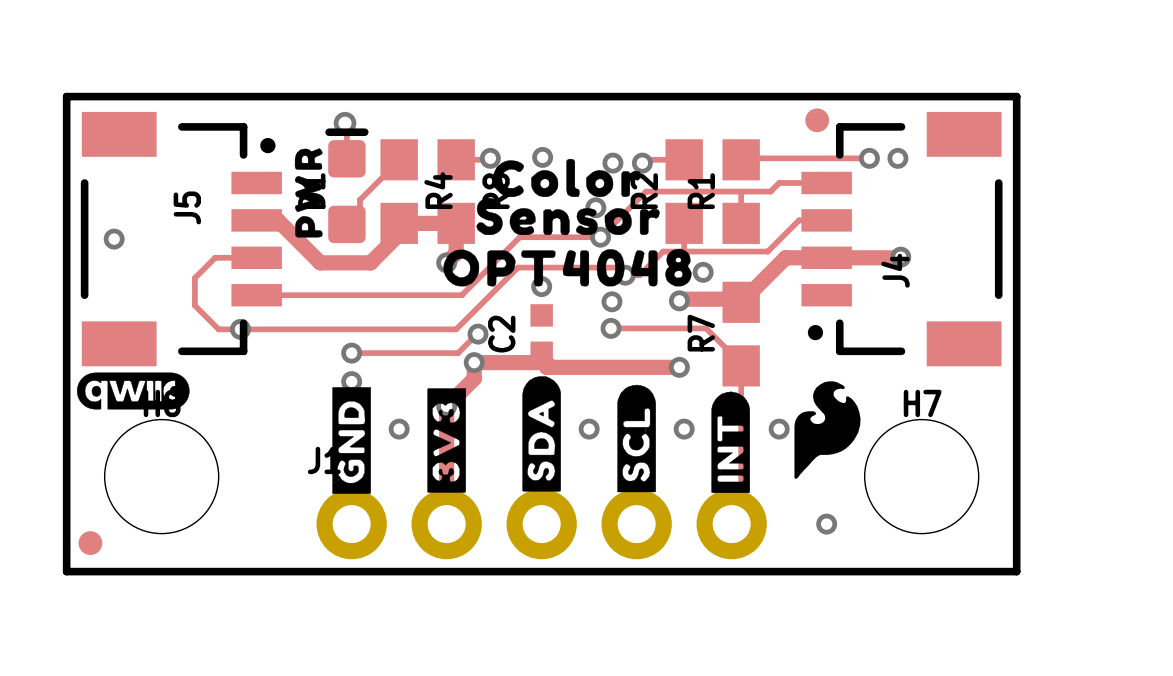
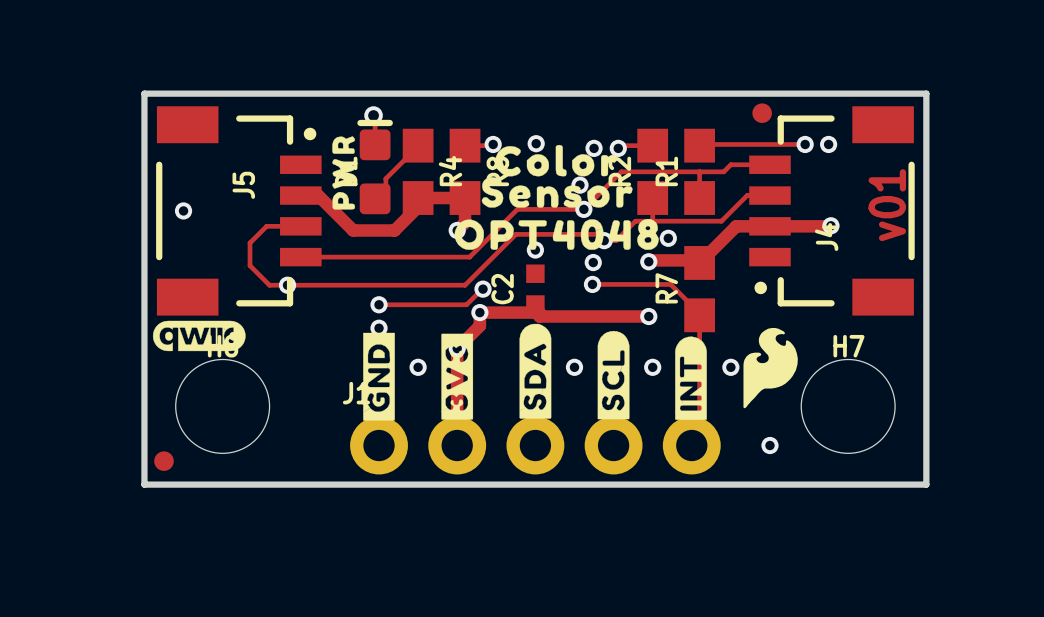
text: none -> v01 (887, 205)

